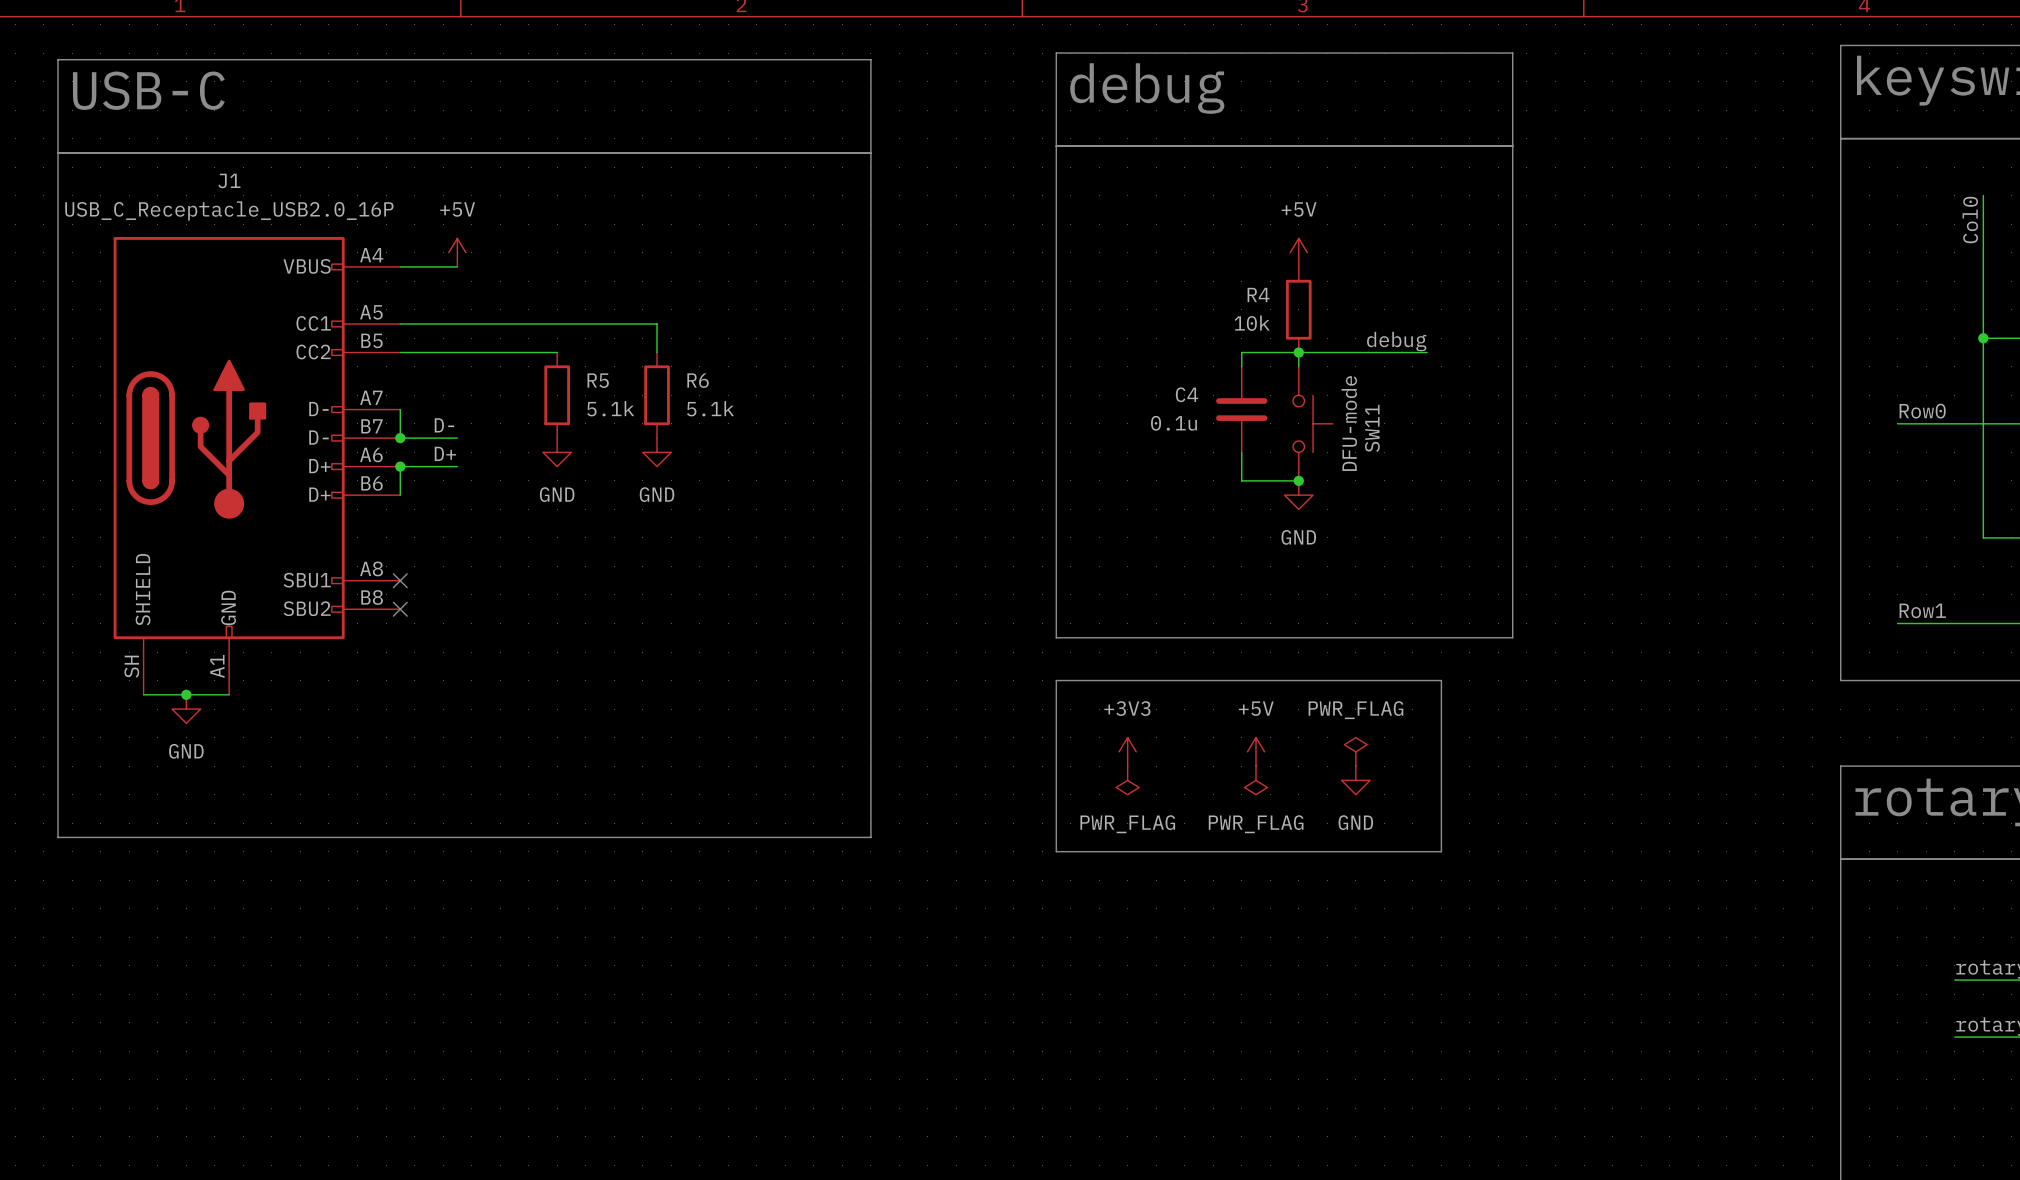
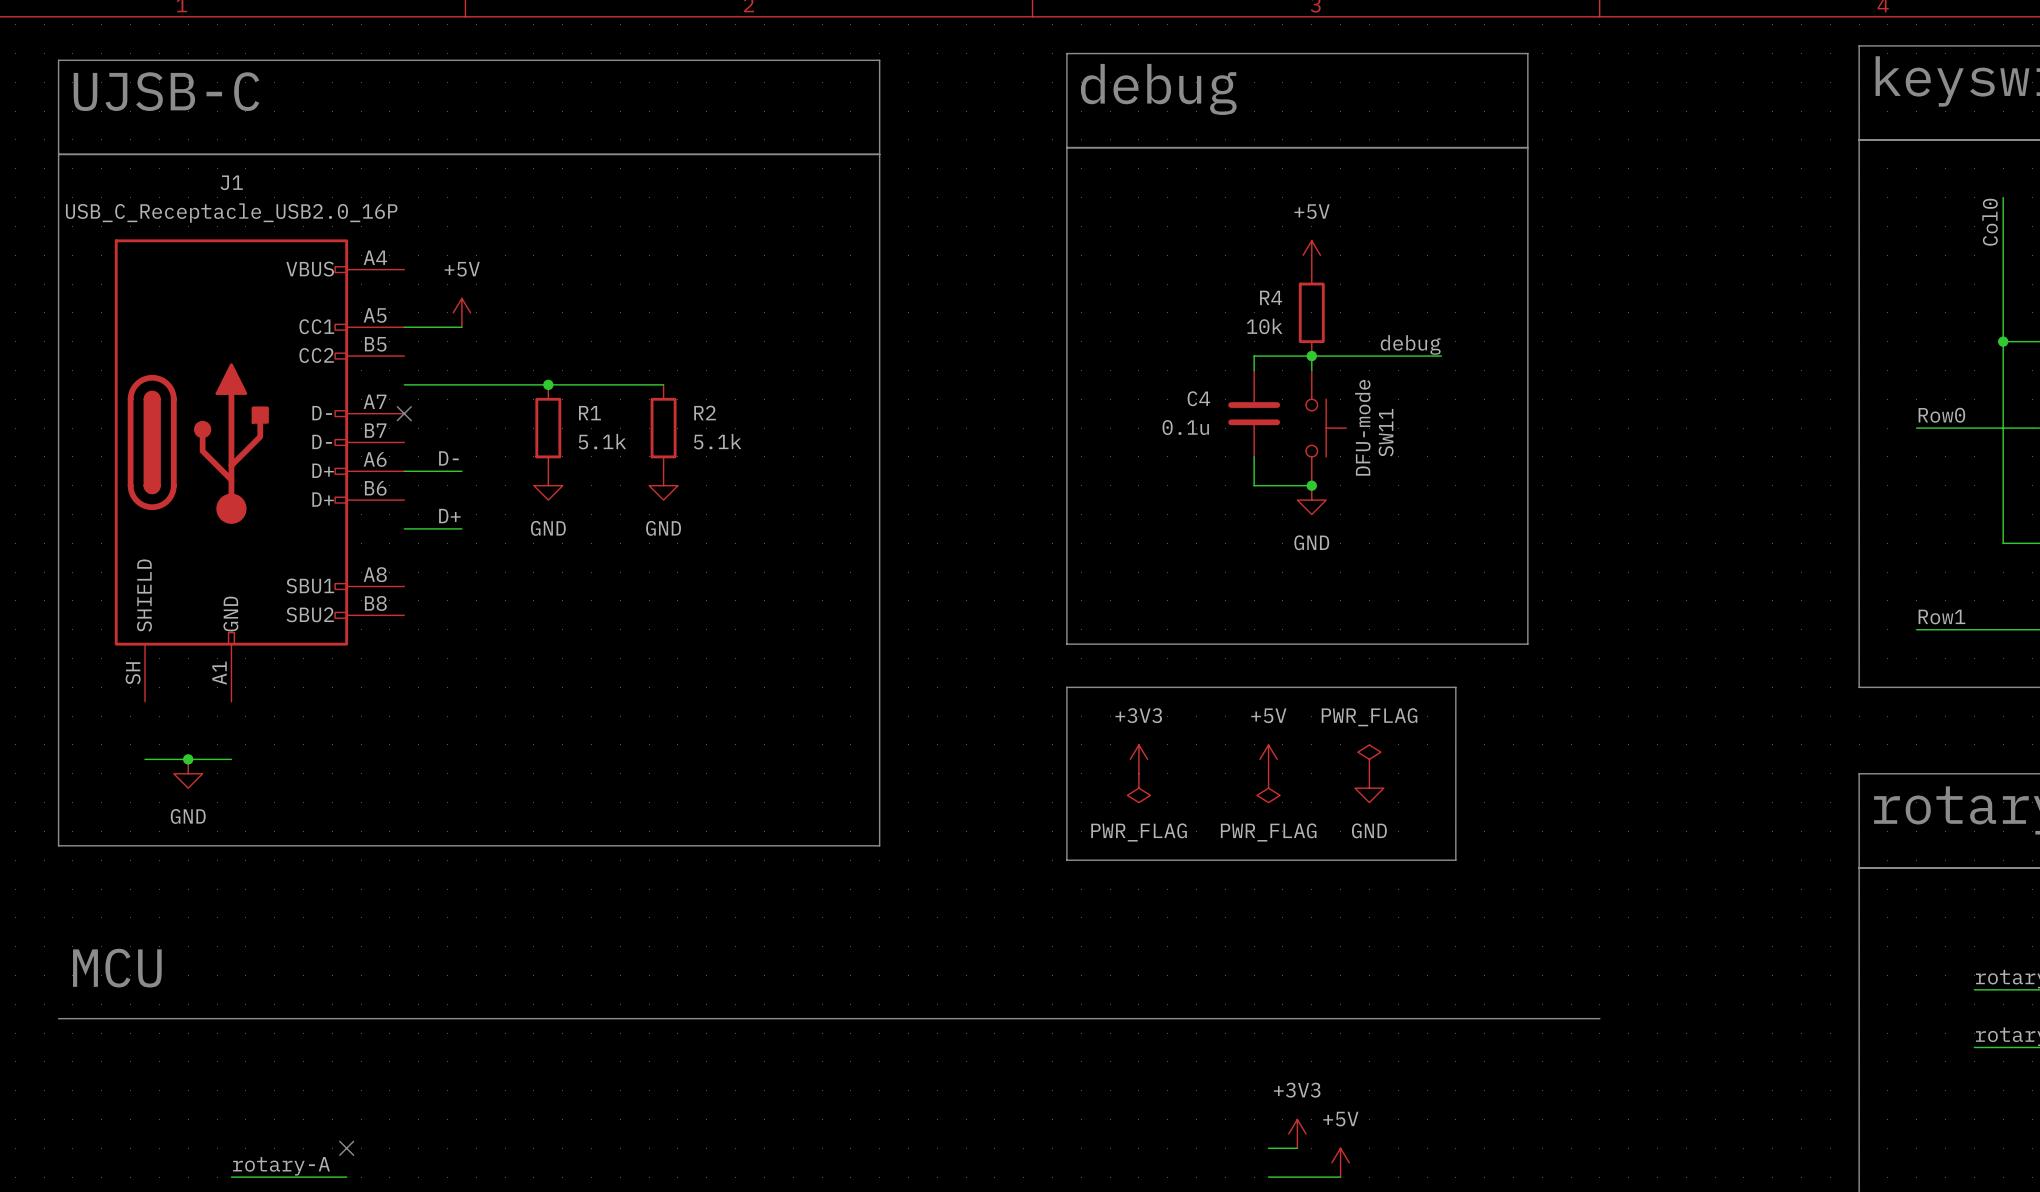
text: USB-C (148, 90) -> UJSB-C (166, 91)
power symbol position: +5V (457, 252) -> +5V (461, 312)
wire: (400, 266) (457, 266) -> (404, 528) (461, 528)
wire: (457, 324) (657, 324) (657, 352) -> none
wire: (400, 352) (557, 352) -> none
wire: none -> (404, 384) (663, 384)
junction: none -> (548, 384)
R5: 5.1k (557, 395) -> none
R6: 5.1k (657, 395) -> none
wire: (400, 409) (400, 438) (457, 438) -> none
no-connect mark: none -> (404, 413)
R1: none -> 5.1k (548, 428)
R2: none -> 5.1k (663, 428)
label: D- (444, 425) -> none
junction: (400, 438) -> none
power symbol position: GND (557, 452) -> GND (548, 485)
power symbol position: GND (657, 452) -> GND (663, 485)
label: D+ (445, 453) -> D- (448, 458)
wire: (400, 466) (400, 495) -> none
junction: (400, 466) -> none
label: none -> D+ (449, 516)
no-connect mark: (400, 580) -> none
no-connect mark: (400, 609) -> none
wire: (143, 694) (229, 694) -> (145, 759) (231, 759)
junction position: (186, 694) -> (188, 759)
power symbol position: GND (186, 709) -> GND (188, 773)
text: none -> MCU (117, 968)
line: none -> (58, 1018) (1599, 1018)
power symbol: none -> +3V3 (1297, 1133)
no-connect mark: none -> (346, 1148)
wire: none -> (1268, 1148) (1297, 1148)
power symbol: none -> +5V (1340, 1162)
label: none -> rotary-A (281, 1166)
wire: none -> (231, 1177) (346, 1177)
wire: none -> (1268, 1177) (1340, 1177)

